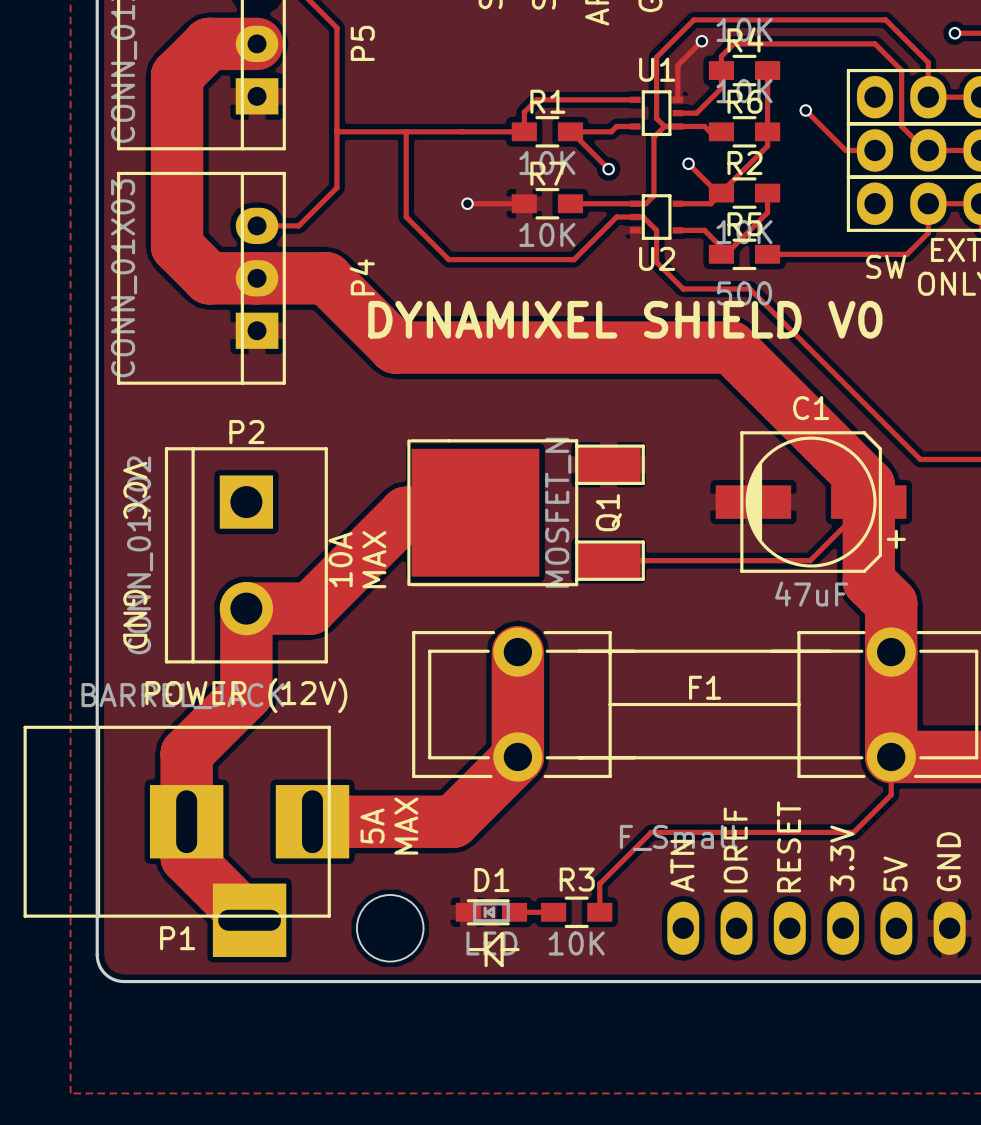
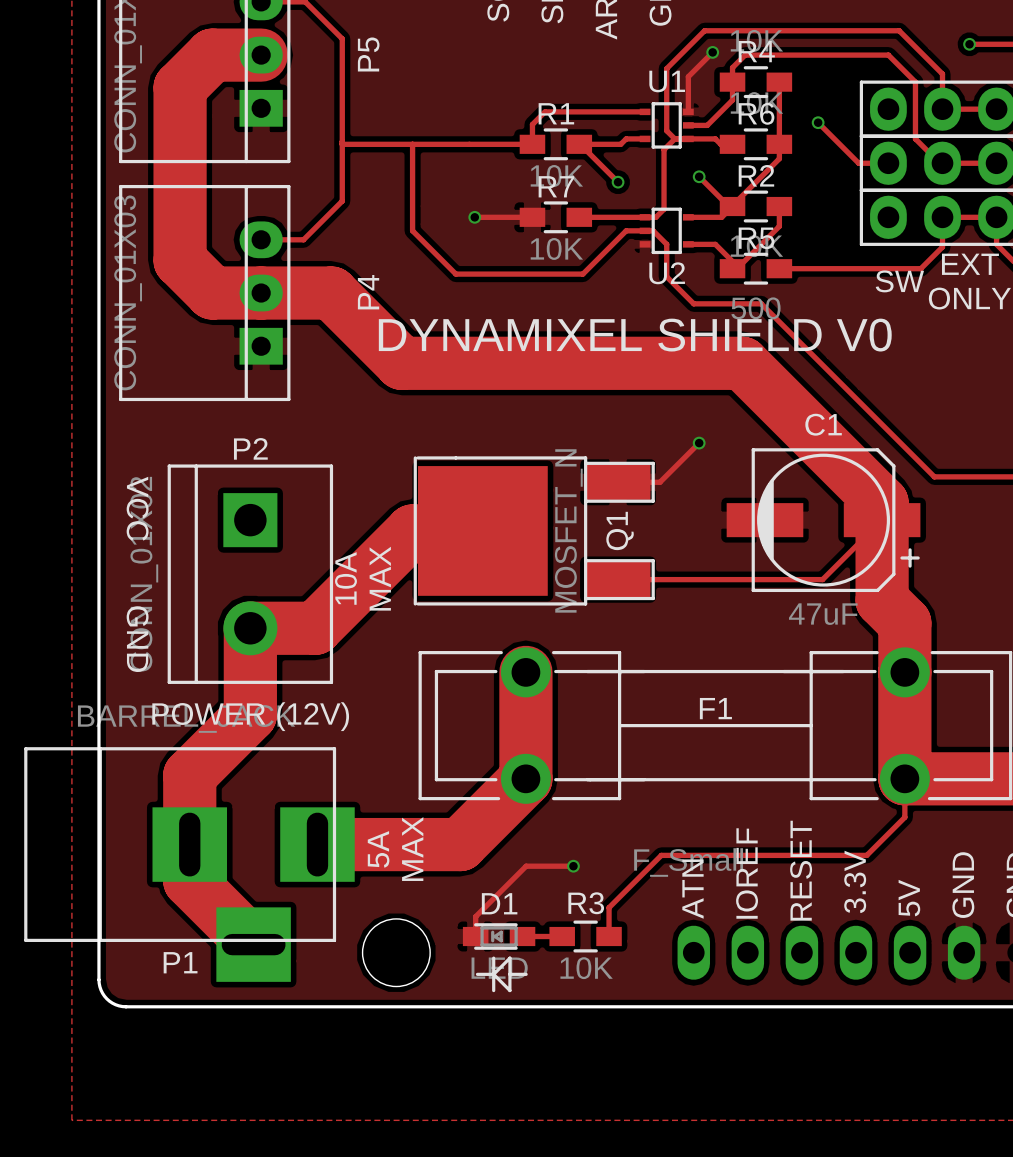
track: none -> (699, 443) (659, 482) (618, 482)
via: none -> (699, 443)
track: none -> (573, 866) (526, 866) (475, 916) (475, 936)
via: none -> (573, 866)

